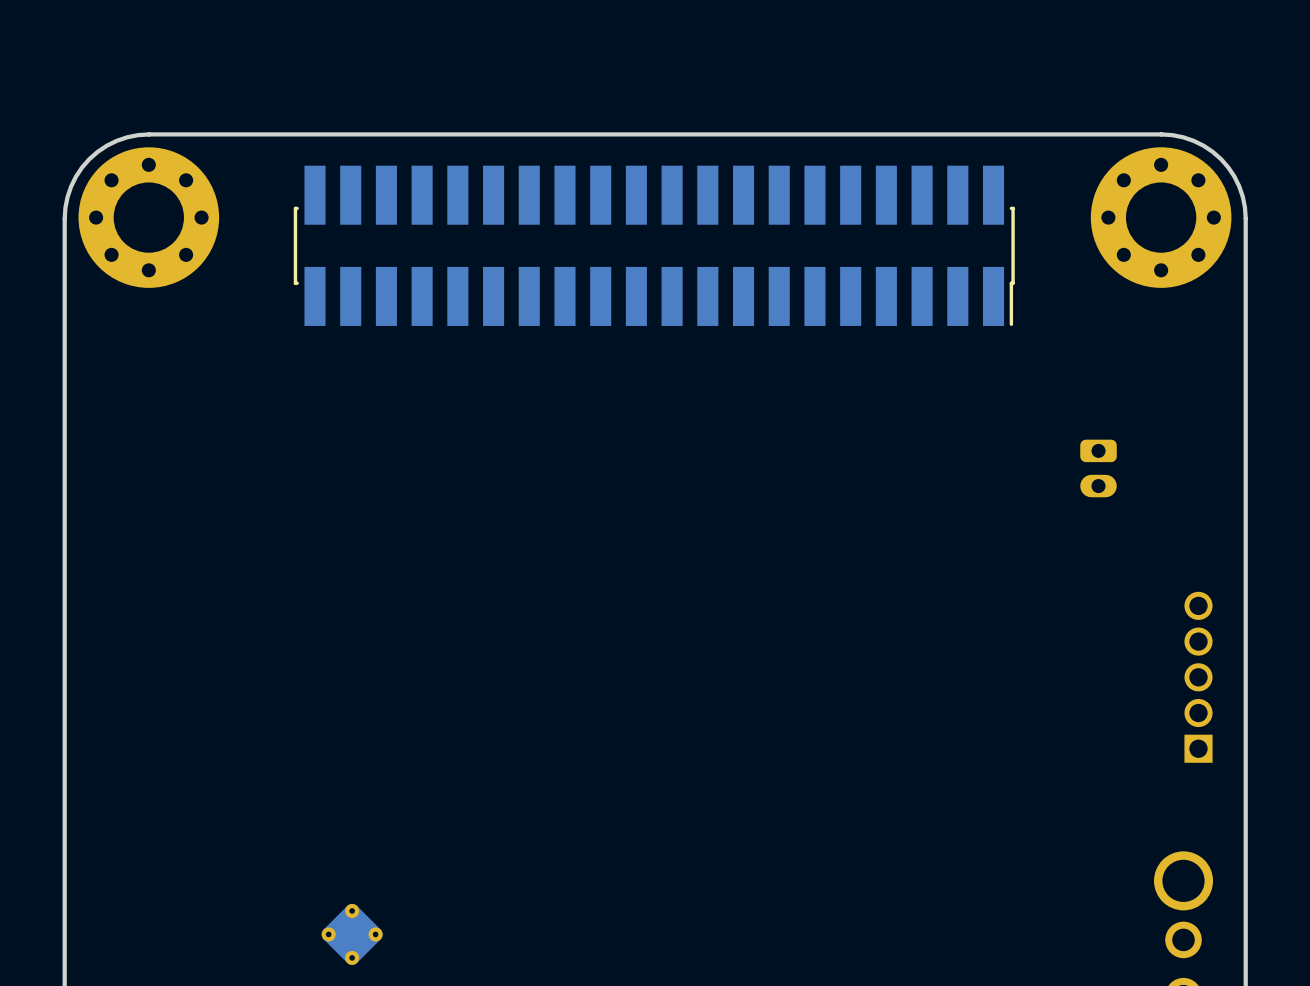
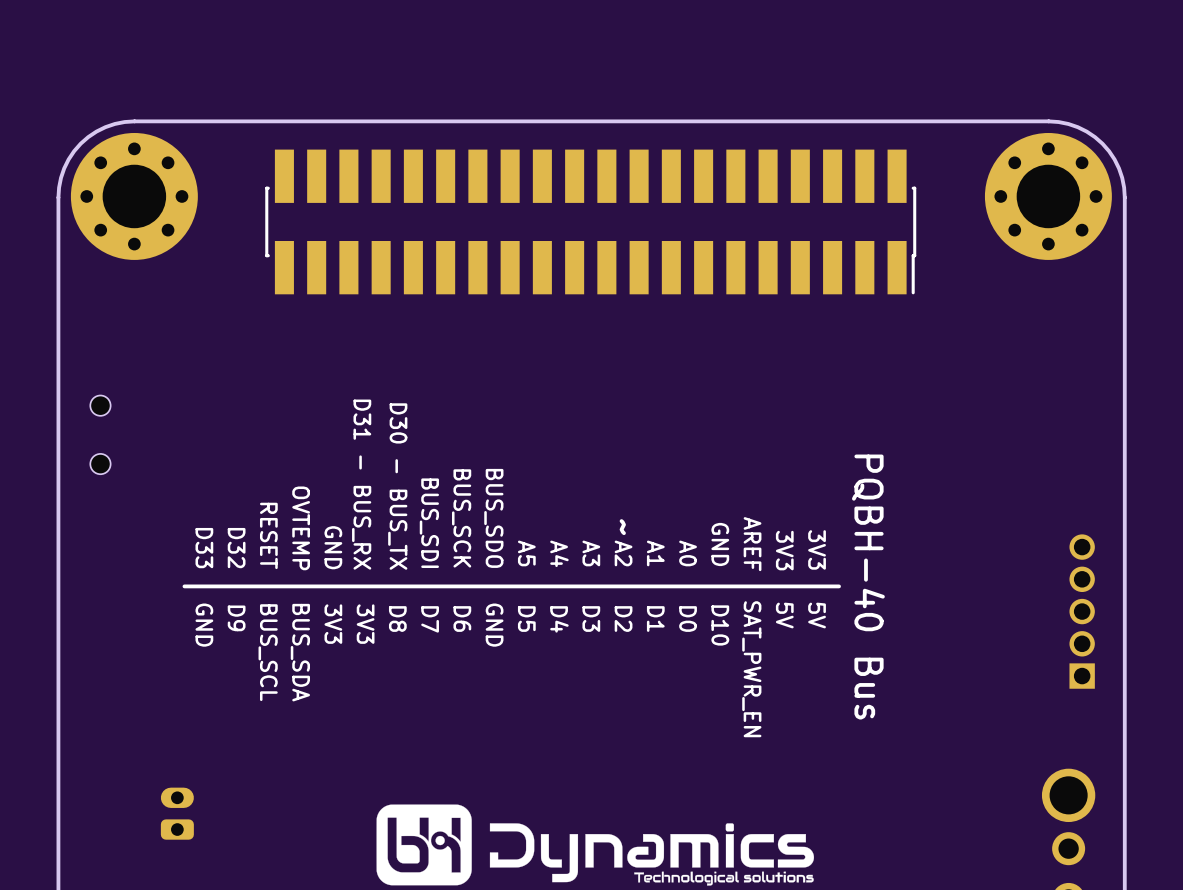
part: (1098, 468) -> none
part: none -> (100, 434)
text: none -> D31 - BUS_RX (361, 484)
text: none -> D30 - BUS_TX (397, 486)
text: none -> BUS_SCK (461, 518)
text: none -> BUS_SDO (493, 518)
text: none -> BUS_SDI (429, 523)
text: none -> ~ (622, 527)
text: none -> OVTEMP (301, 528)
text: none -> RESET (268, 535)
text: none -> AREF (752, 544)
text: none -> GND (720, 544)
text: none -> GND (333, 547)
text: none -> D33 (204, 548)
text: none -> D32 (236, 548)
text: none -> 3V3 (784, 550)
text: none -> 3V3 (817, 549)
text: none -> A5 (526, 553)
text: none -> A3 (591, 553)
text: none -> A2 (623, 553)
text: none -> A1 (655, 553)
text: none -> A0 (688, 553)
text: none -> A4 (559, 553)
line: none -> (839, 586) (184, 586)
text: none -> PQBH-40 Bus (868, 587)
text: none -> 5V (784, 615)
text: none -> 5V (817, 615)
text: none -> D9 (236, 618)
text: none -> D8 (397, 619)
text: none -> D7 (430, 619)
text: none -> D6 (462, 619)
text: none -> D5 (526, 619)
text: none -> D4 (559, 619)
text: none -> D3 (591, 619)
text: none -> D2 (623, 619)
text: none -> D1 (655, 619)
text: none -> D0 (688, 619)
text: none -> 3V3 (333, 624)
text: none -> 3V3 (365, 624)
text: none -> GND (204, 625)
text: none -> GND (494, 625)
text: none -> D10 (720, 625)
text: none -> BUS_SCL (268, 652)
text: none -> BUS_SDA (300, 652)
text: none -> SAT_PWR_EN (751, 669)
drawing: none -> [376, 804, 815, 886]
part: none -> (177, 813)
part: (352, 934) -> none

